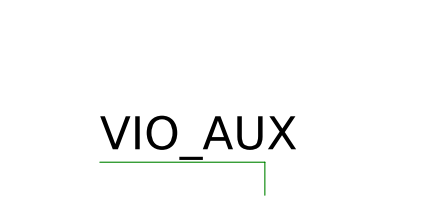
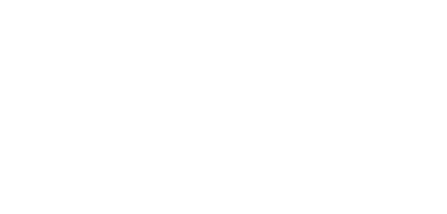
label: VIO_AUX (198, 137) -> none
wire: (99, 162) (264, 162) (264, 195) -> none

